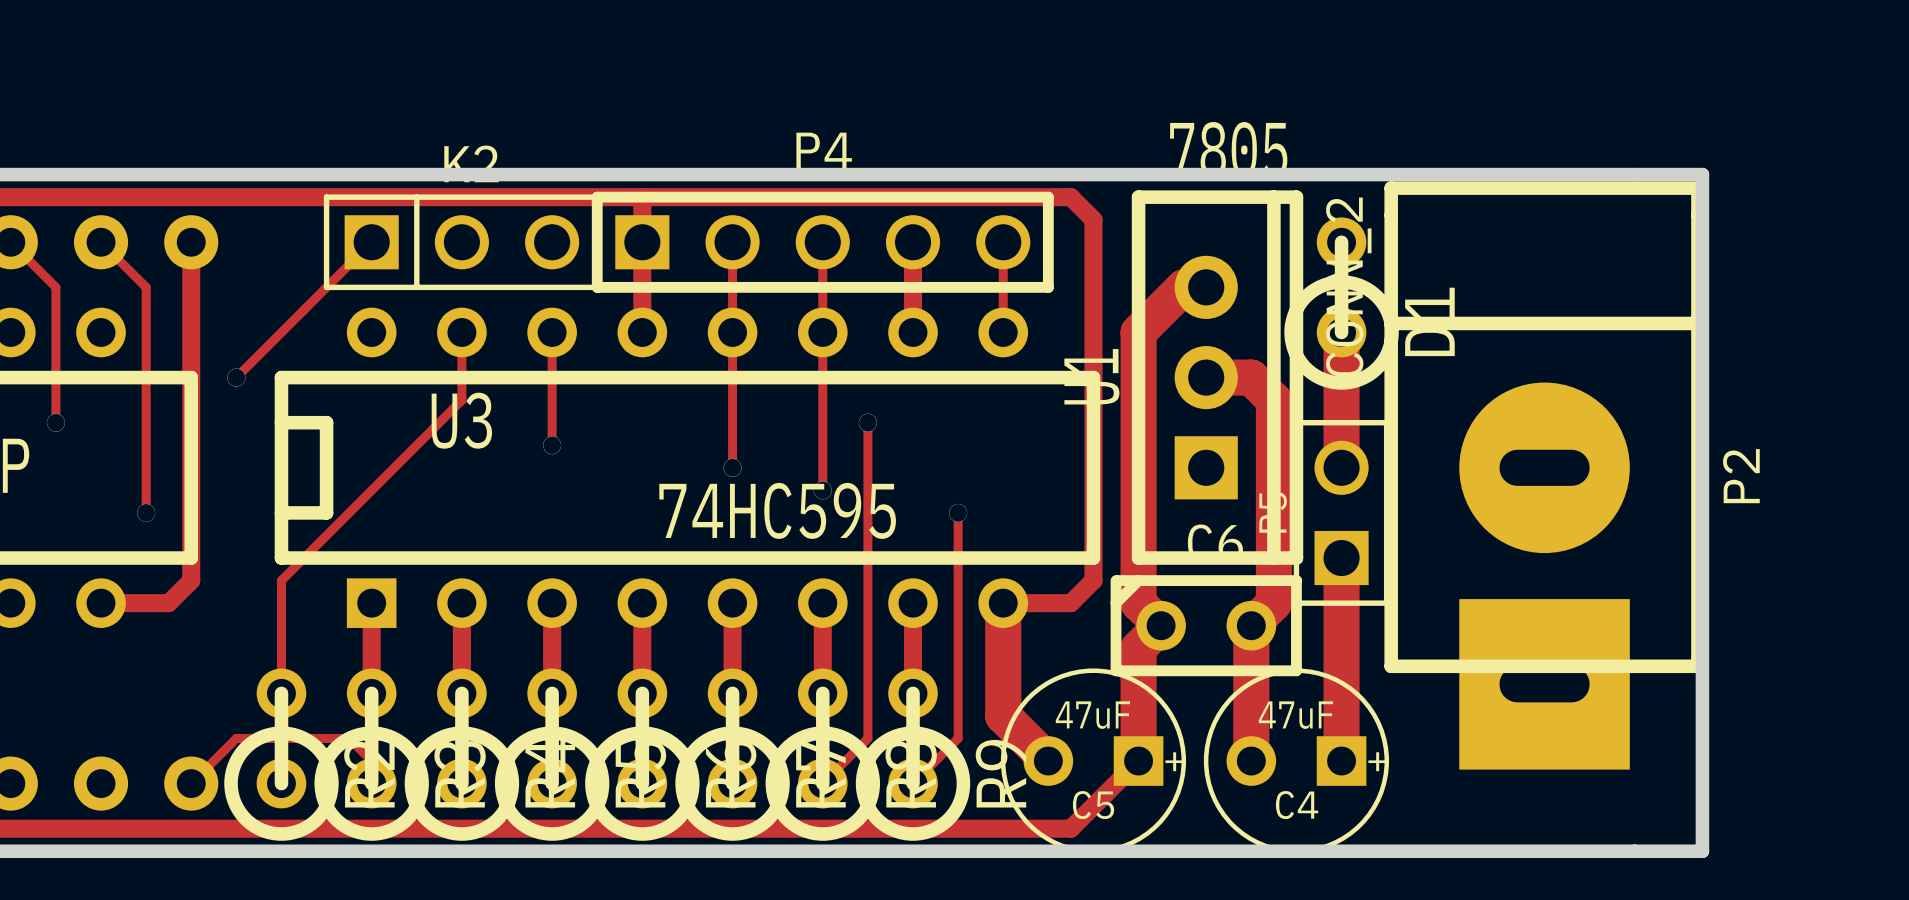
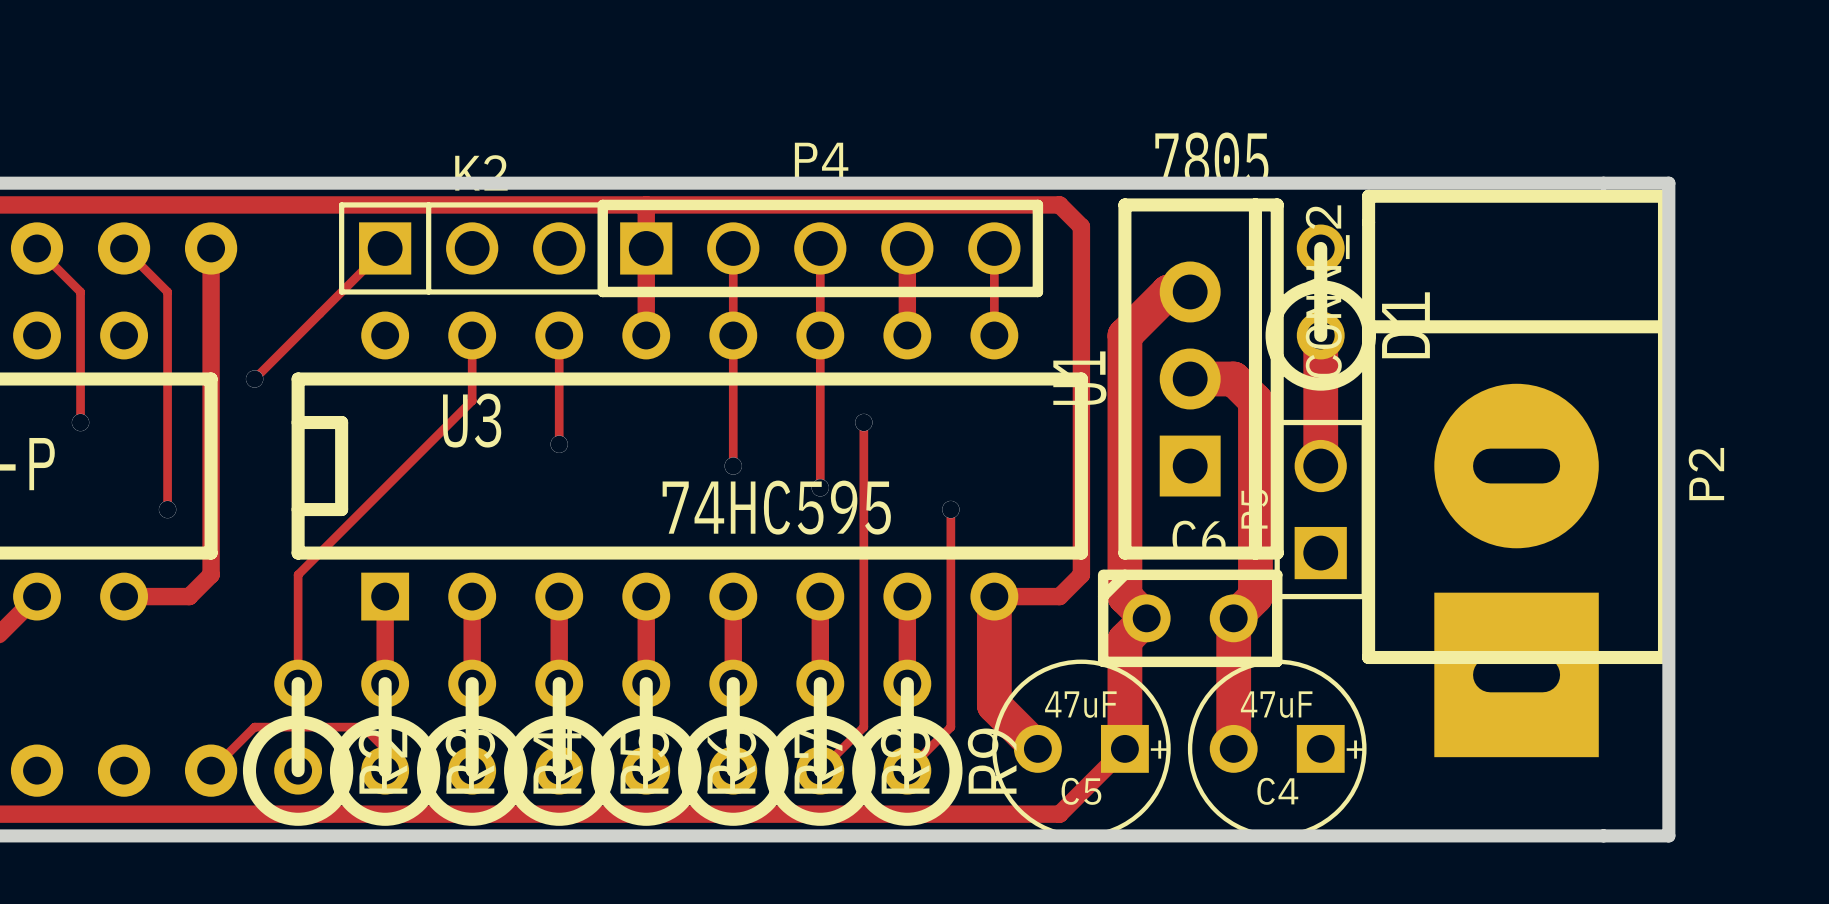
track: (1341, 558) (1341, 761) -> none

